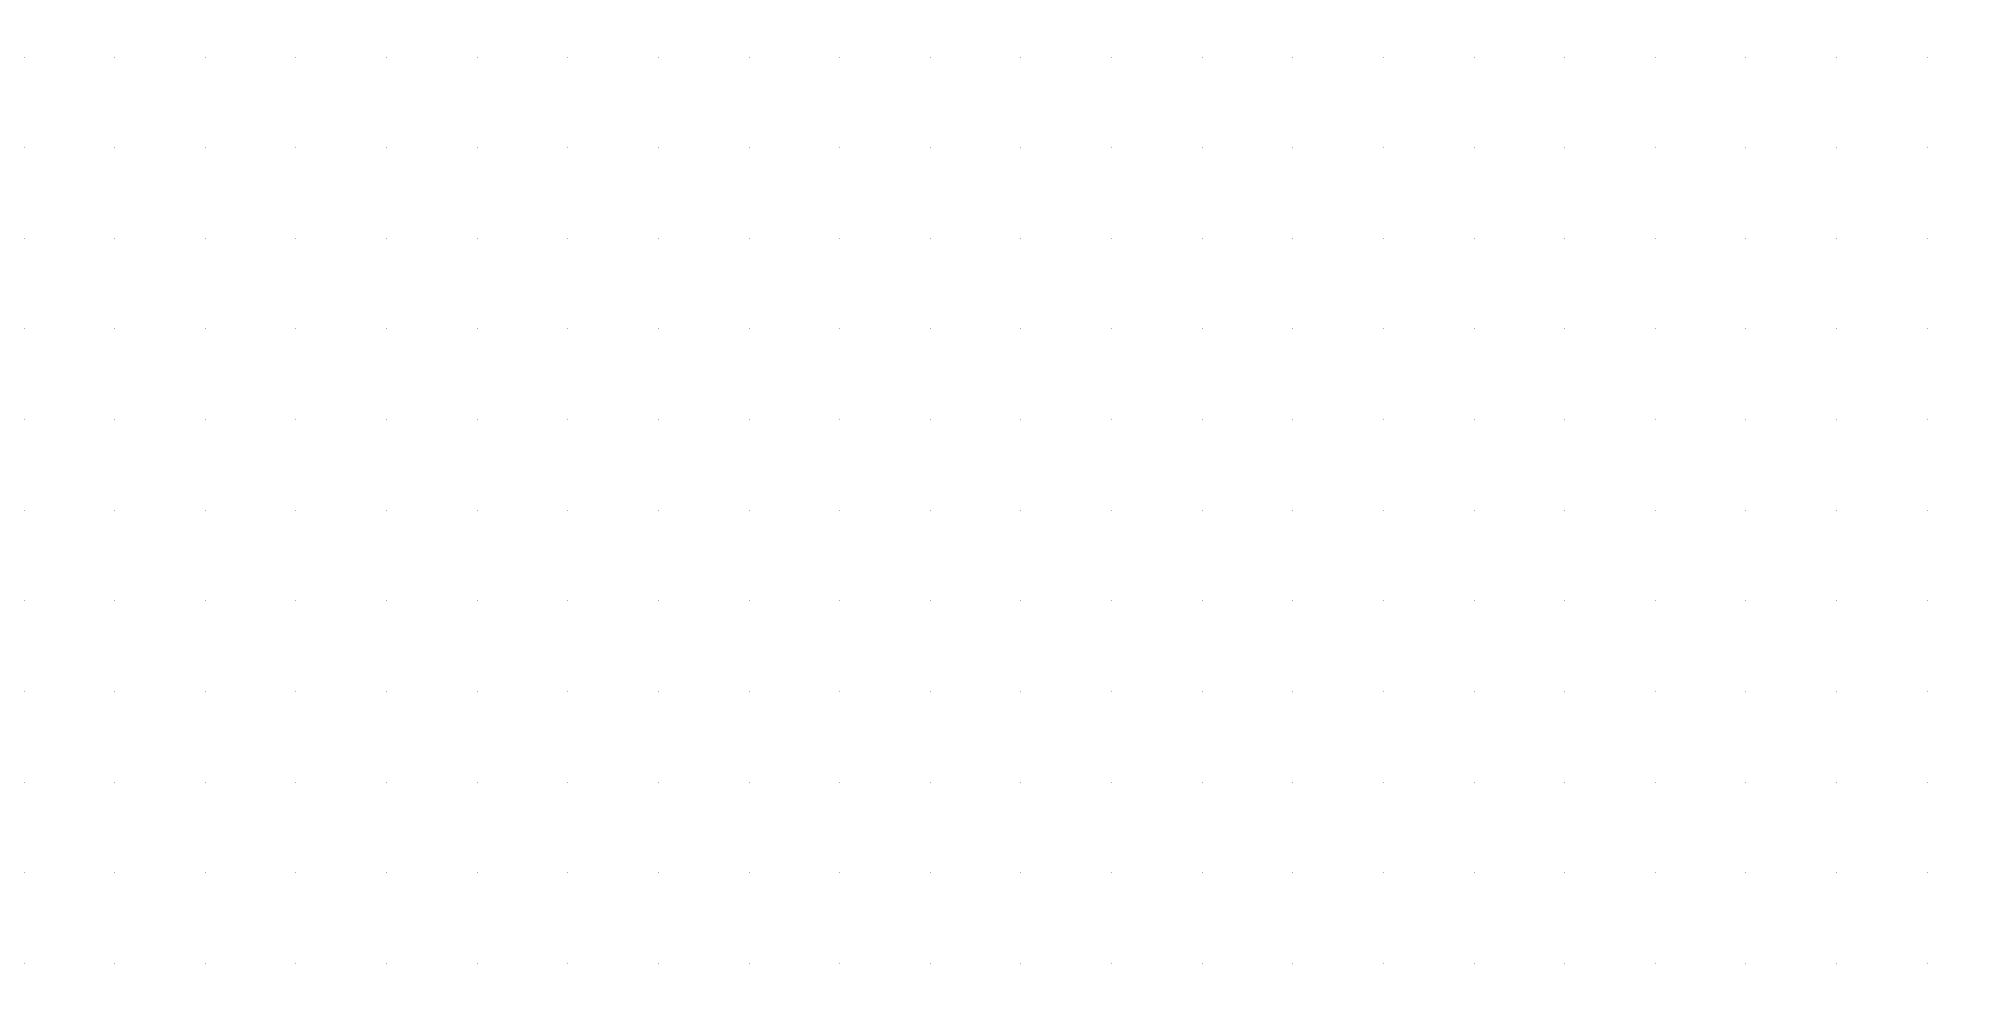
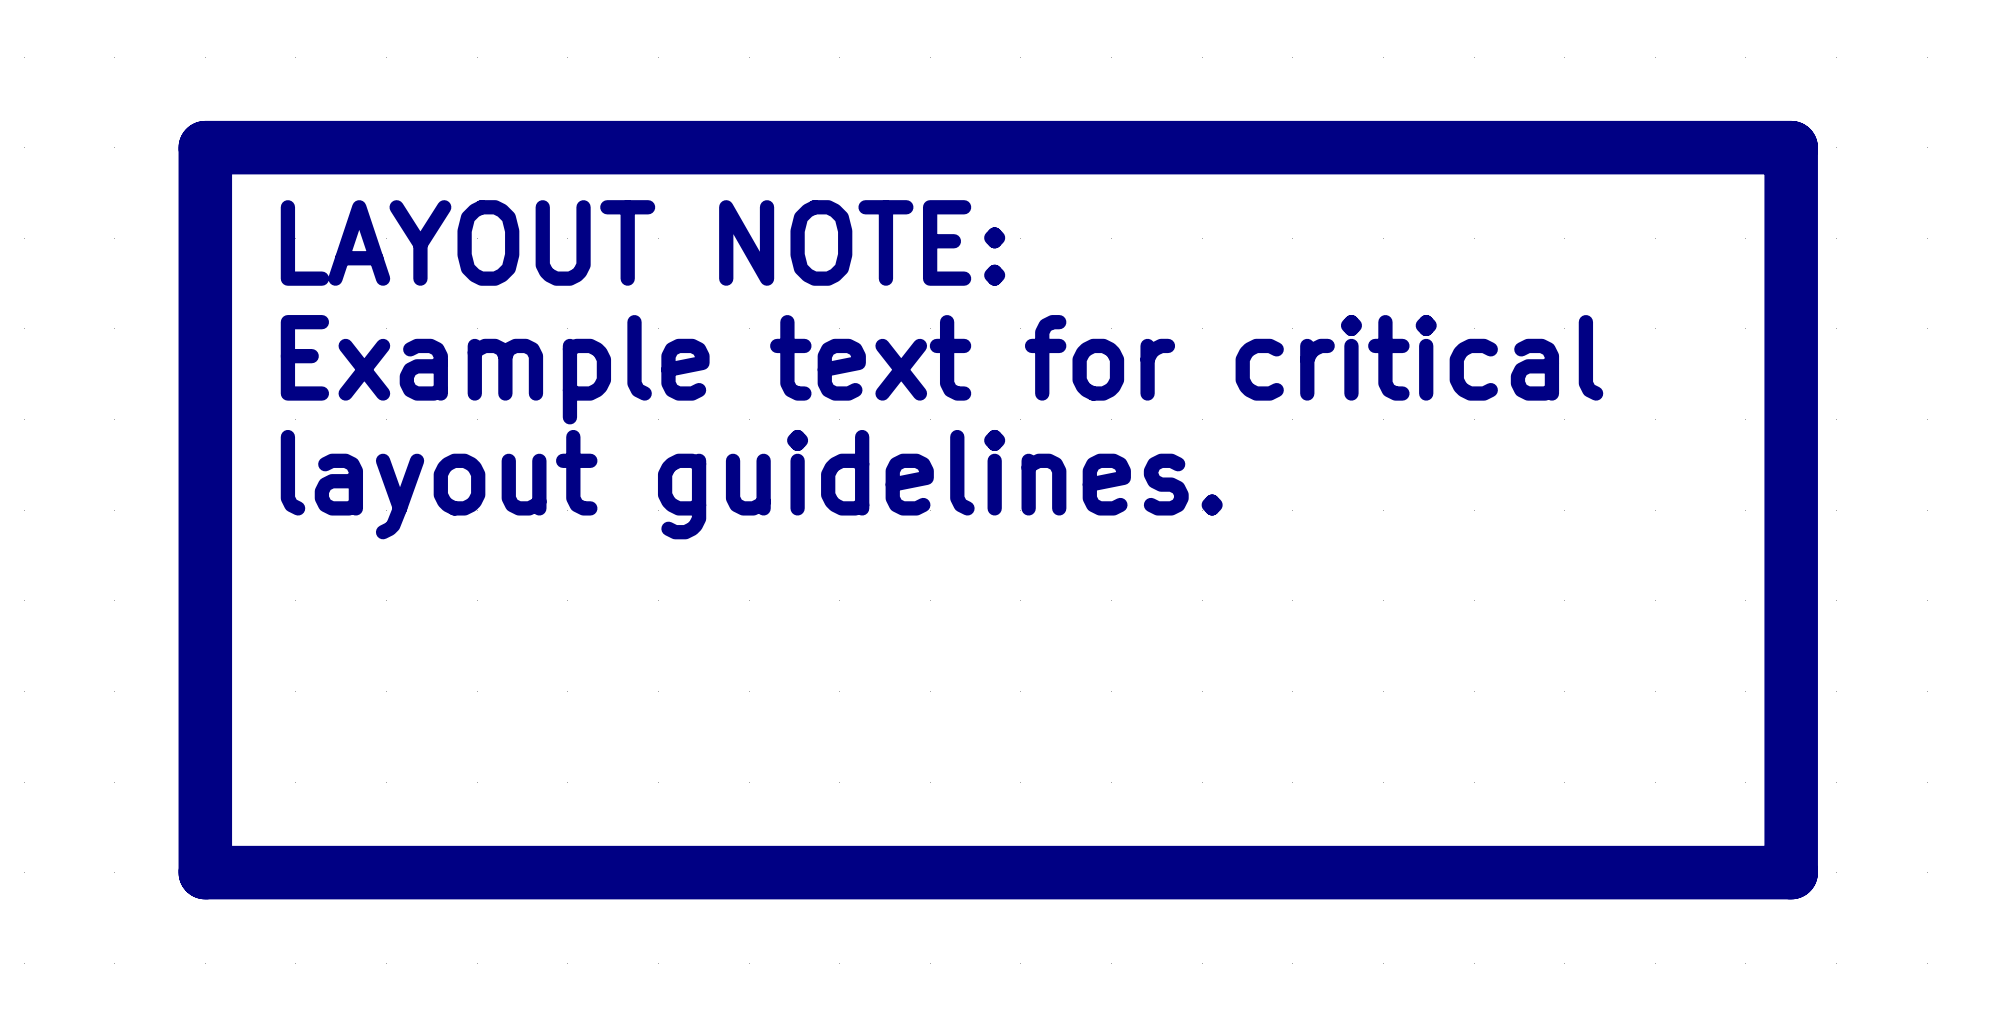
line: none -> (205, 147) (1791, 147) (1791, 872) (205, 872) (205, 147)
text: none -> LAYOUT NOTE: (643, 242)
text: none -> Example text for critical (942, 369)
text: none -> layout guidelines. (751, 484)

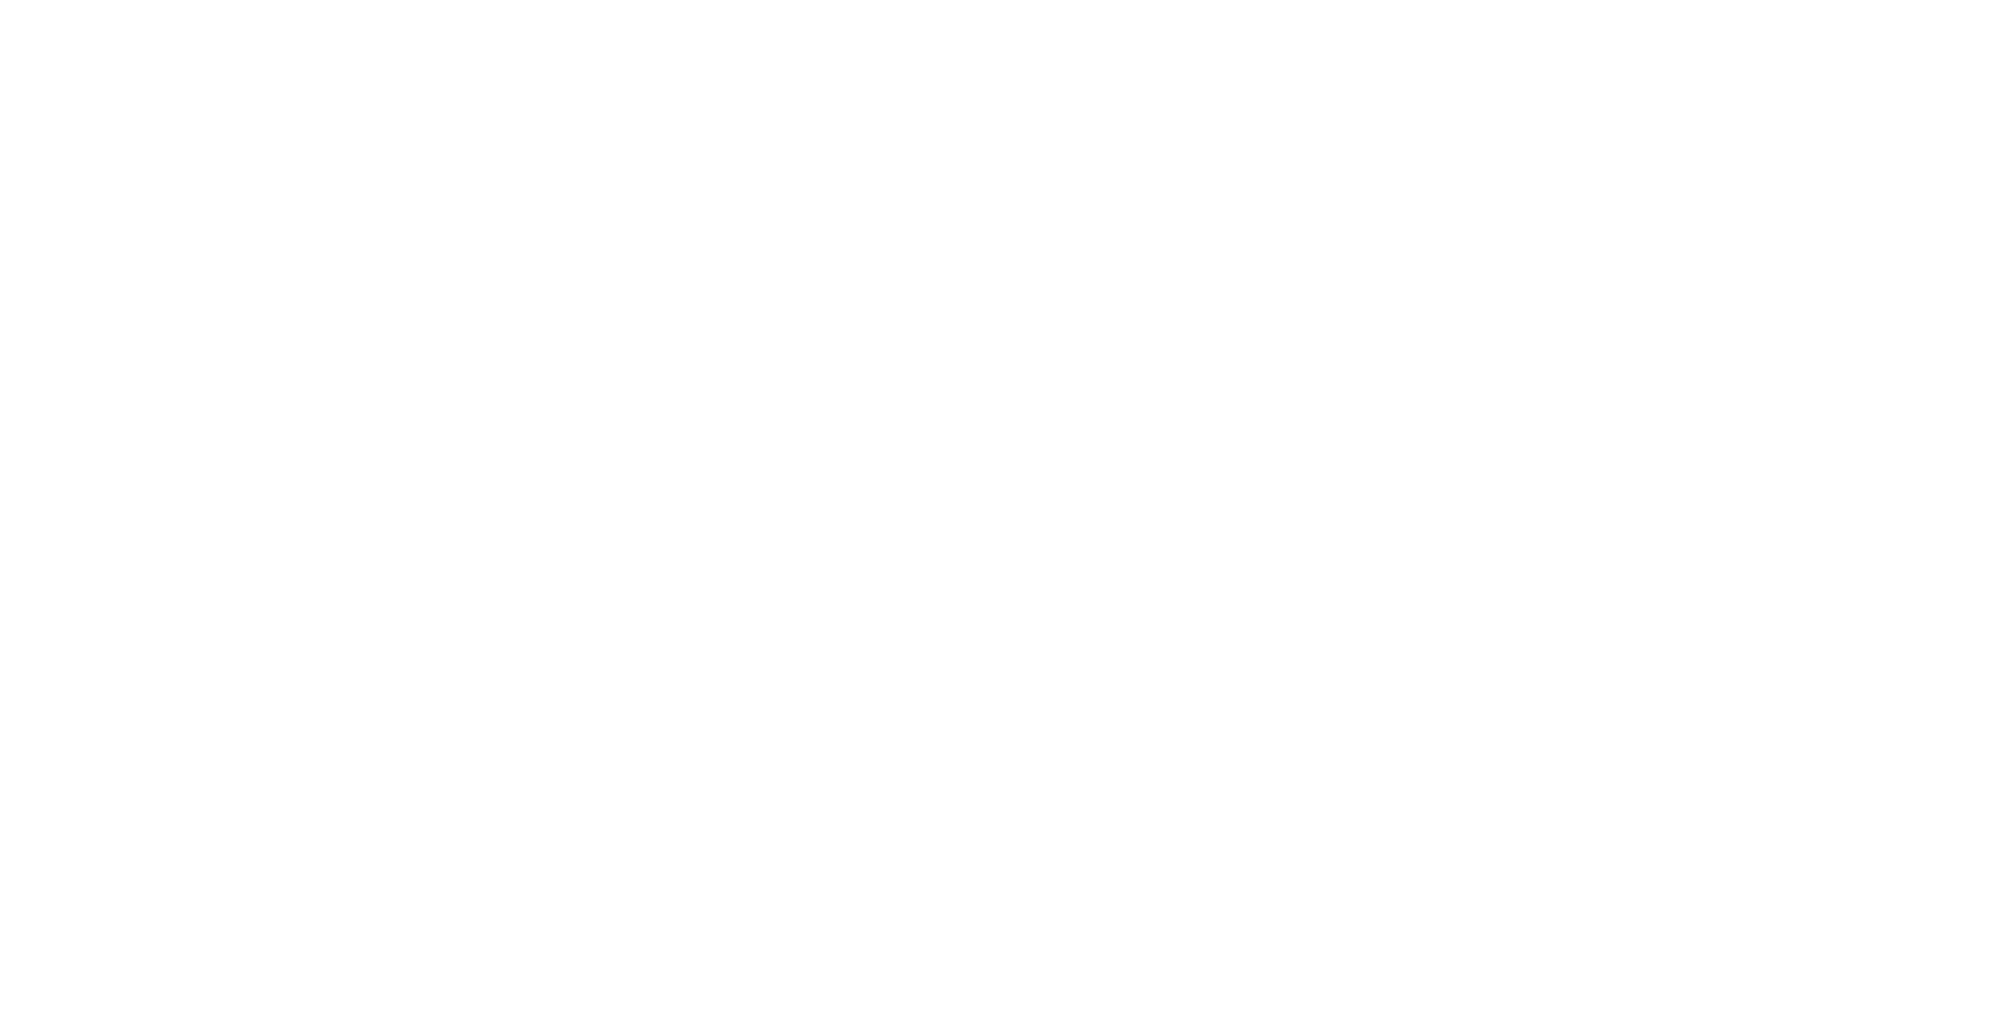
line: (205, 147) (1791, 147) (1791, 872) (205, 872) (205, 147) -> none
text: LAYOUT NOTE: (643, 242) -> none
text: Example text for critical (942, 369) -> none
text: layout guidelines. (751, 484) -> none

